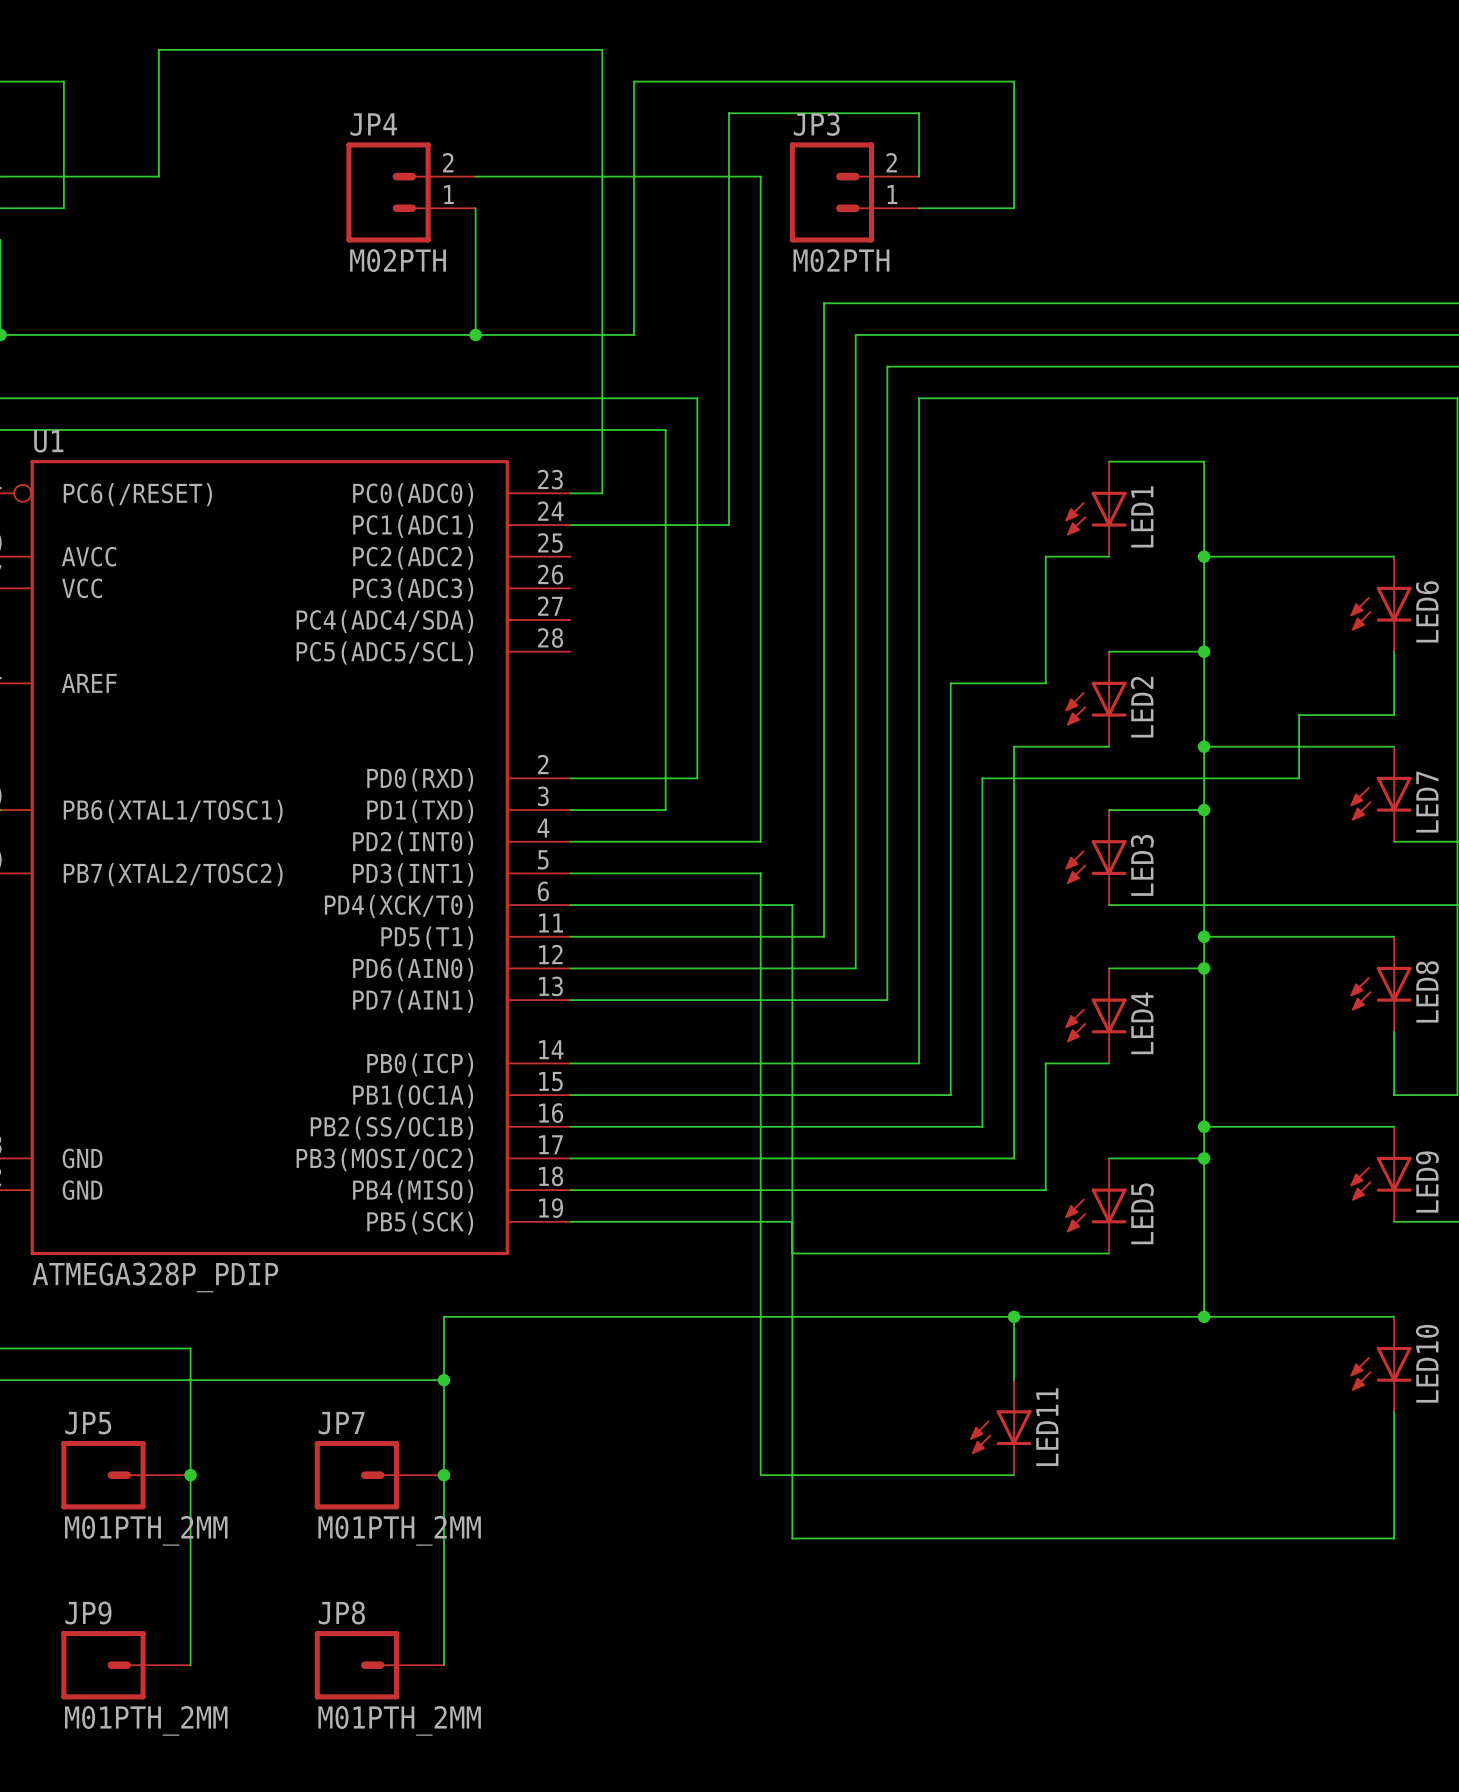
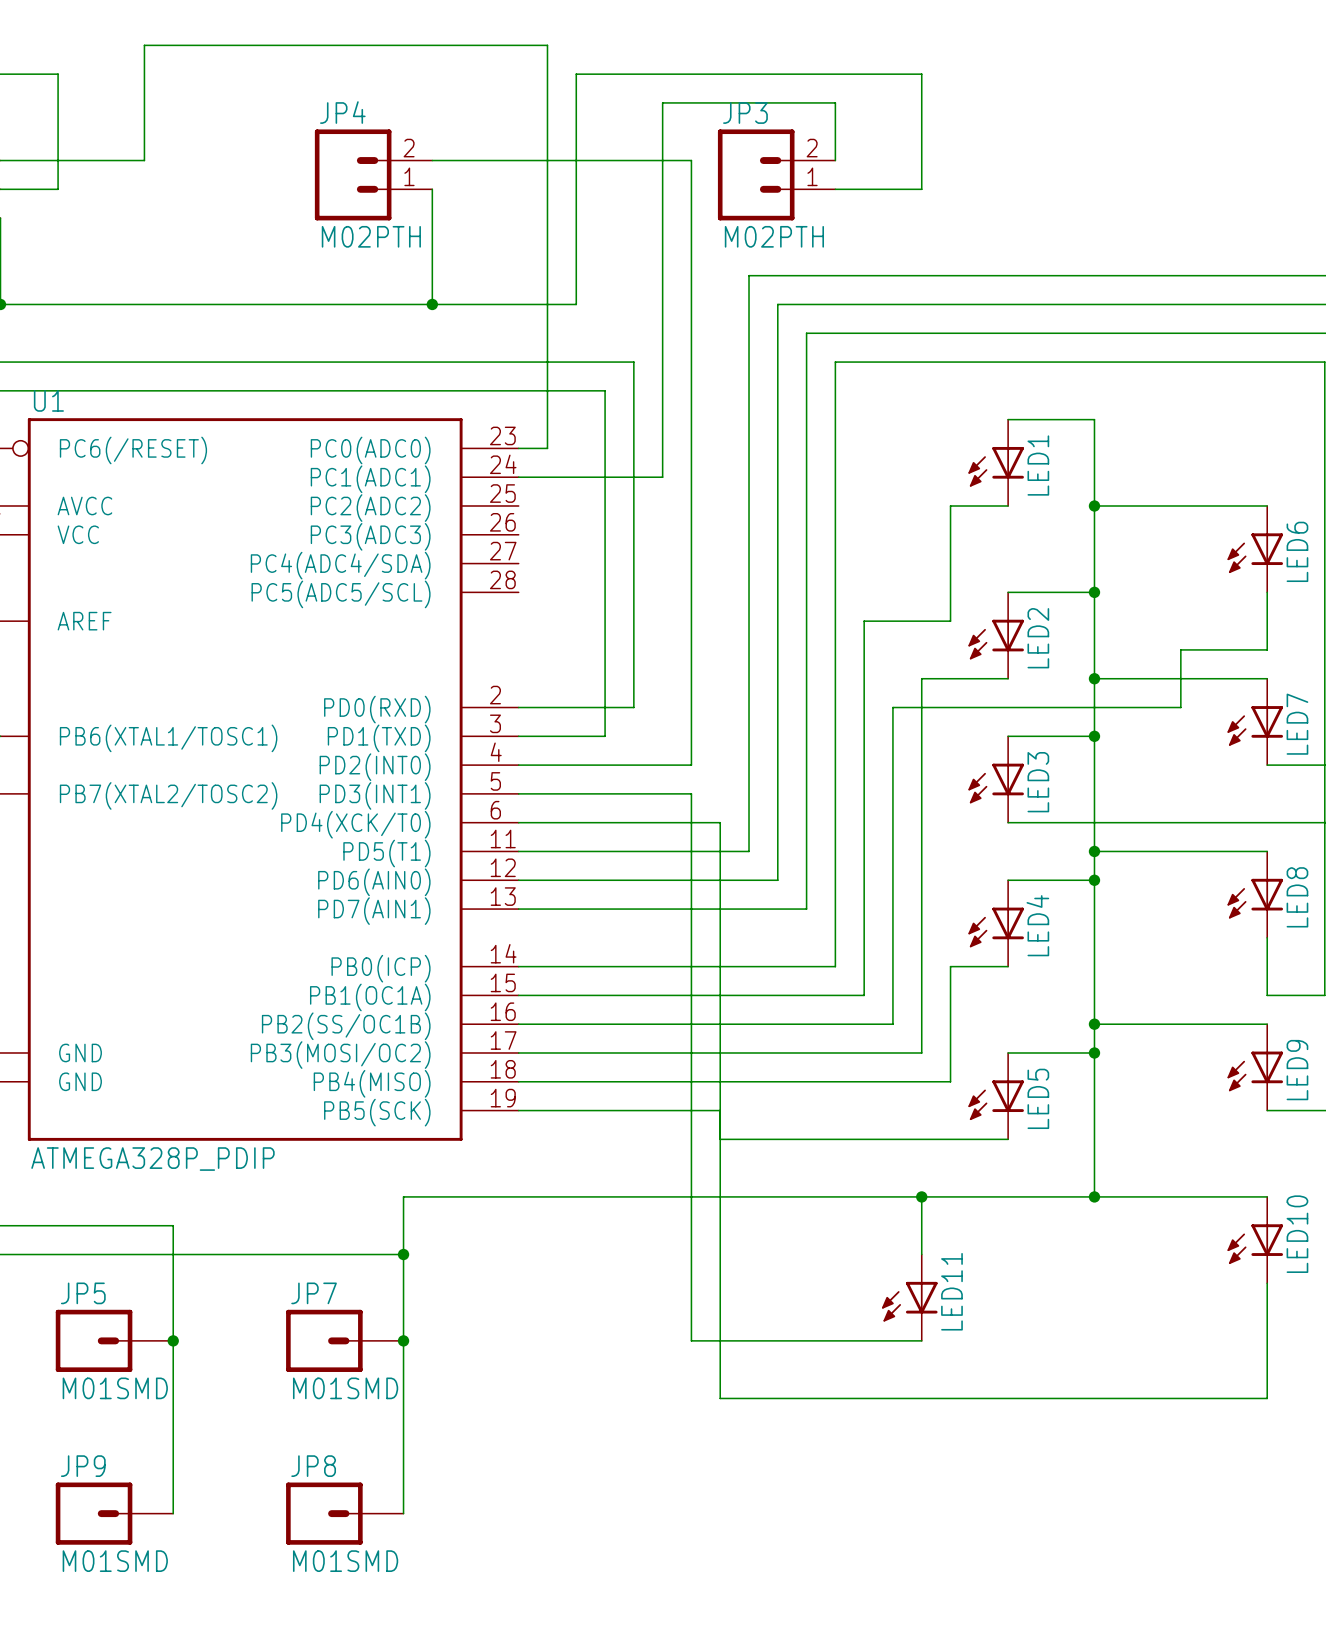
JP5 value: M01PTH_2MM (146, 1530) -> M01SMD (115, 1388)
JP7 value: M01PTH_2MM (399, 1530) -> M01SMD (345, 1388)
JP9 value: M01PTH_2MM (146, 1720) -> M01SMD (115, 1561)
JP8 value: M01PTH_2MM (399, 1720) -> M01SMD (345, 1561)

